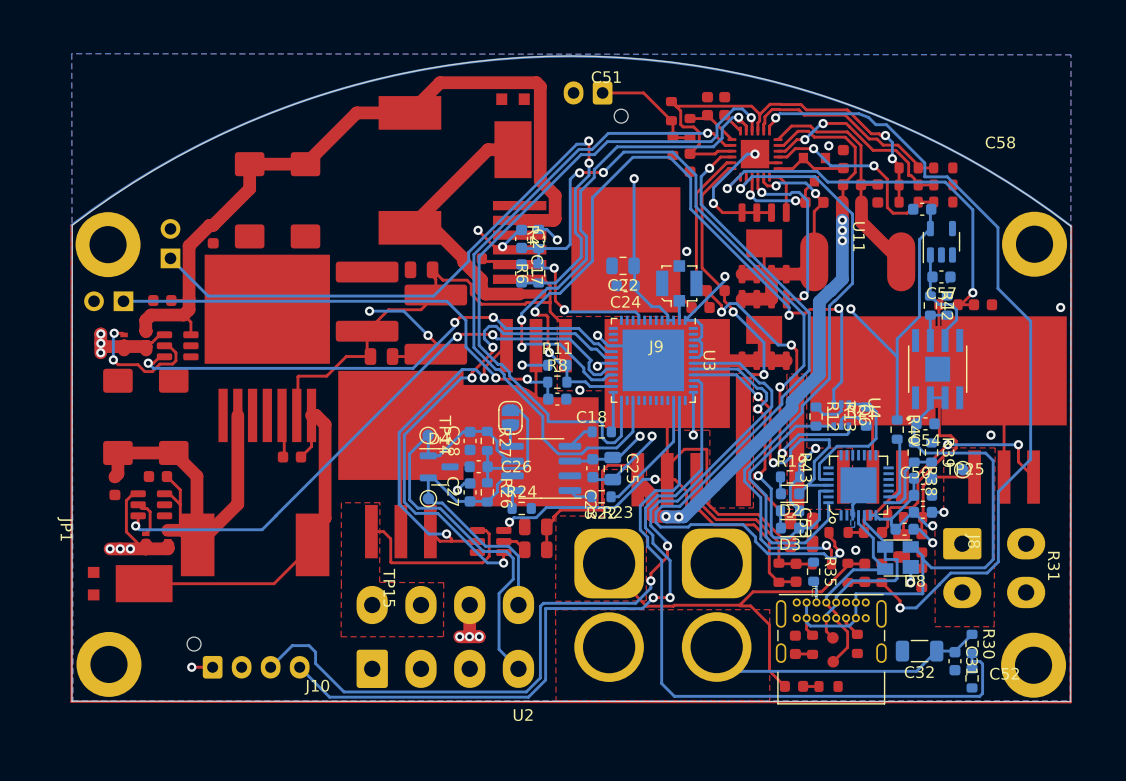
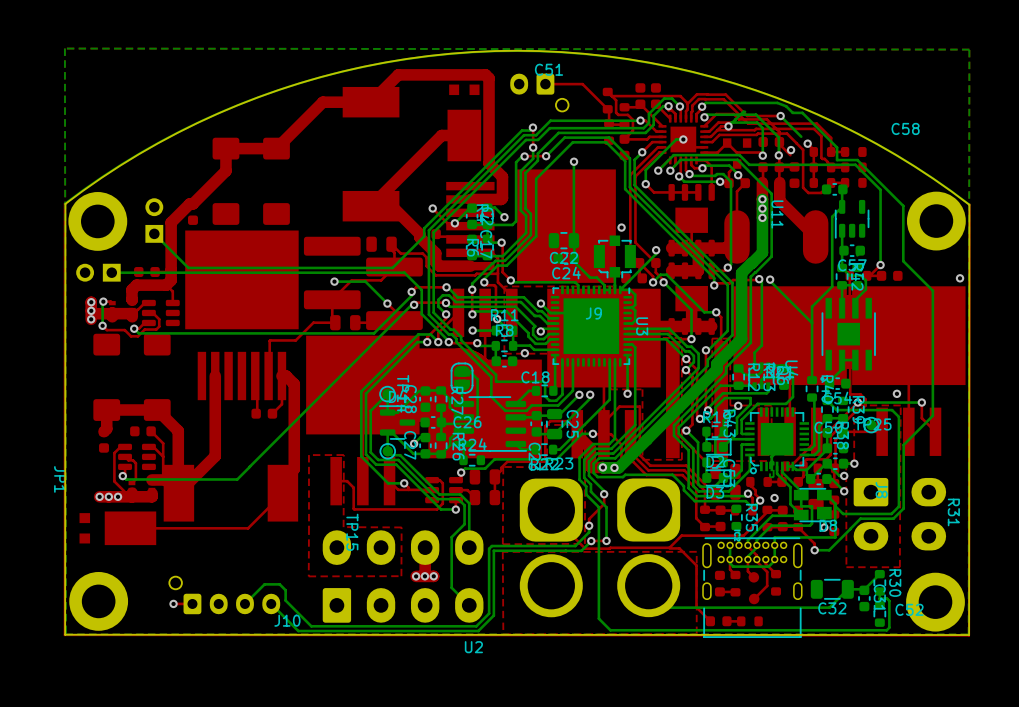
top track: (801, 104) (806, 109) (847, 109) (871, 133) (885, 135) -> (725, 94) (747, 116) (780, 116)
top track: (798, 109) (804, 115) (845, 115) (869, 139) (877, 139) (883, 145) (897, 145) (918, 165) -> (723, 99) (748, 123) (816, 123) (831, 137) (831, 149)
top track: (823, 123) (846, 123) (873, 150) (895, 150) (908, 163) (908, 175) -> (717, 130) (814, 128) (821, 136) (822, 158)
via: (823, 123) -> none
bottom track: none -> (780, 116) (801, 136)
via: none -> (780, 116)
bottom track: none -> (704, 117) (707, 114) (756, 114) (778, 137) (778, 155)
via: none -> (704, 117)
top track: (793, 135) (797, 131) (808, 131) (814, 137) (845, 137) (855, 147) (855, 172) (843, 184) -> (718, 122) (731, 122)
bottom track: none -> (731, 122) (757, 122) (762, 128) (762, 155)
bottom track: (885, 135) (892, 142) (892, 158) -> none
via: (885, 135) -> none
via: (828, 145) -> none
top track: (813, 148) (794, 149) -> (803, 162) (803, 149) (786, 133) (719, 134)
bottom track: (813, 148) (830, 165) (873, 165) -> none
via: (813, 148) -> none
top track: none -> (779, 142) (790, 155)
part rotation: 0° (843, 159) -> 90° clockwise (771, 142)
top track: (873, 165) (887, 179) -> none
via: none -> (762, 155)
via: none -> (778, 155)

